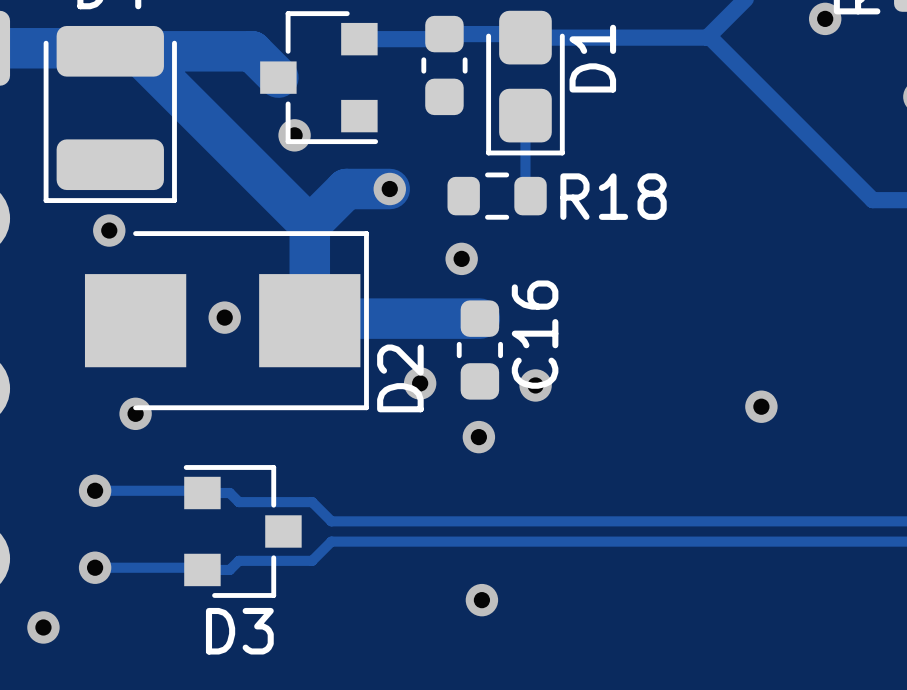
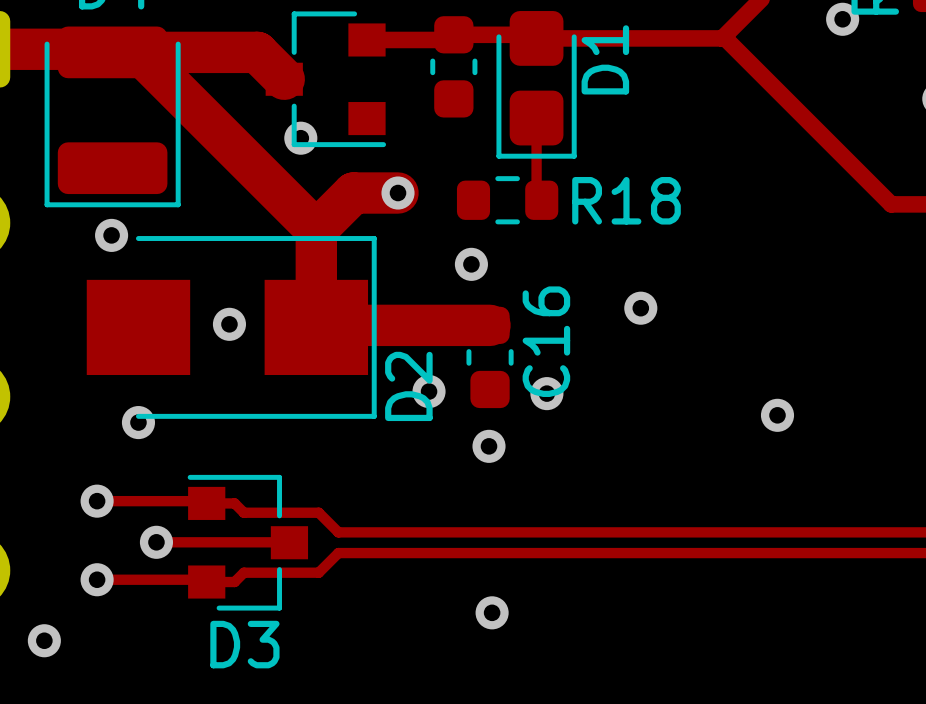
via: none -> (640, 308)
track: none -> (156, 542) (289, 542)
via: none -> (156, 542)

